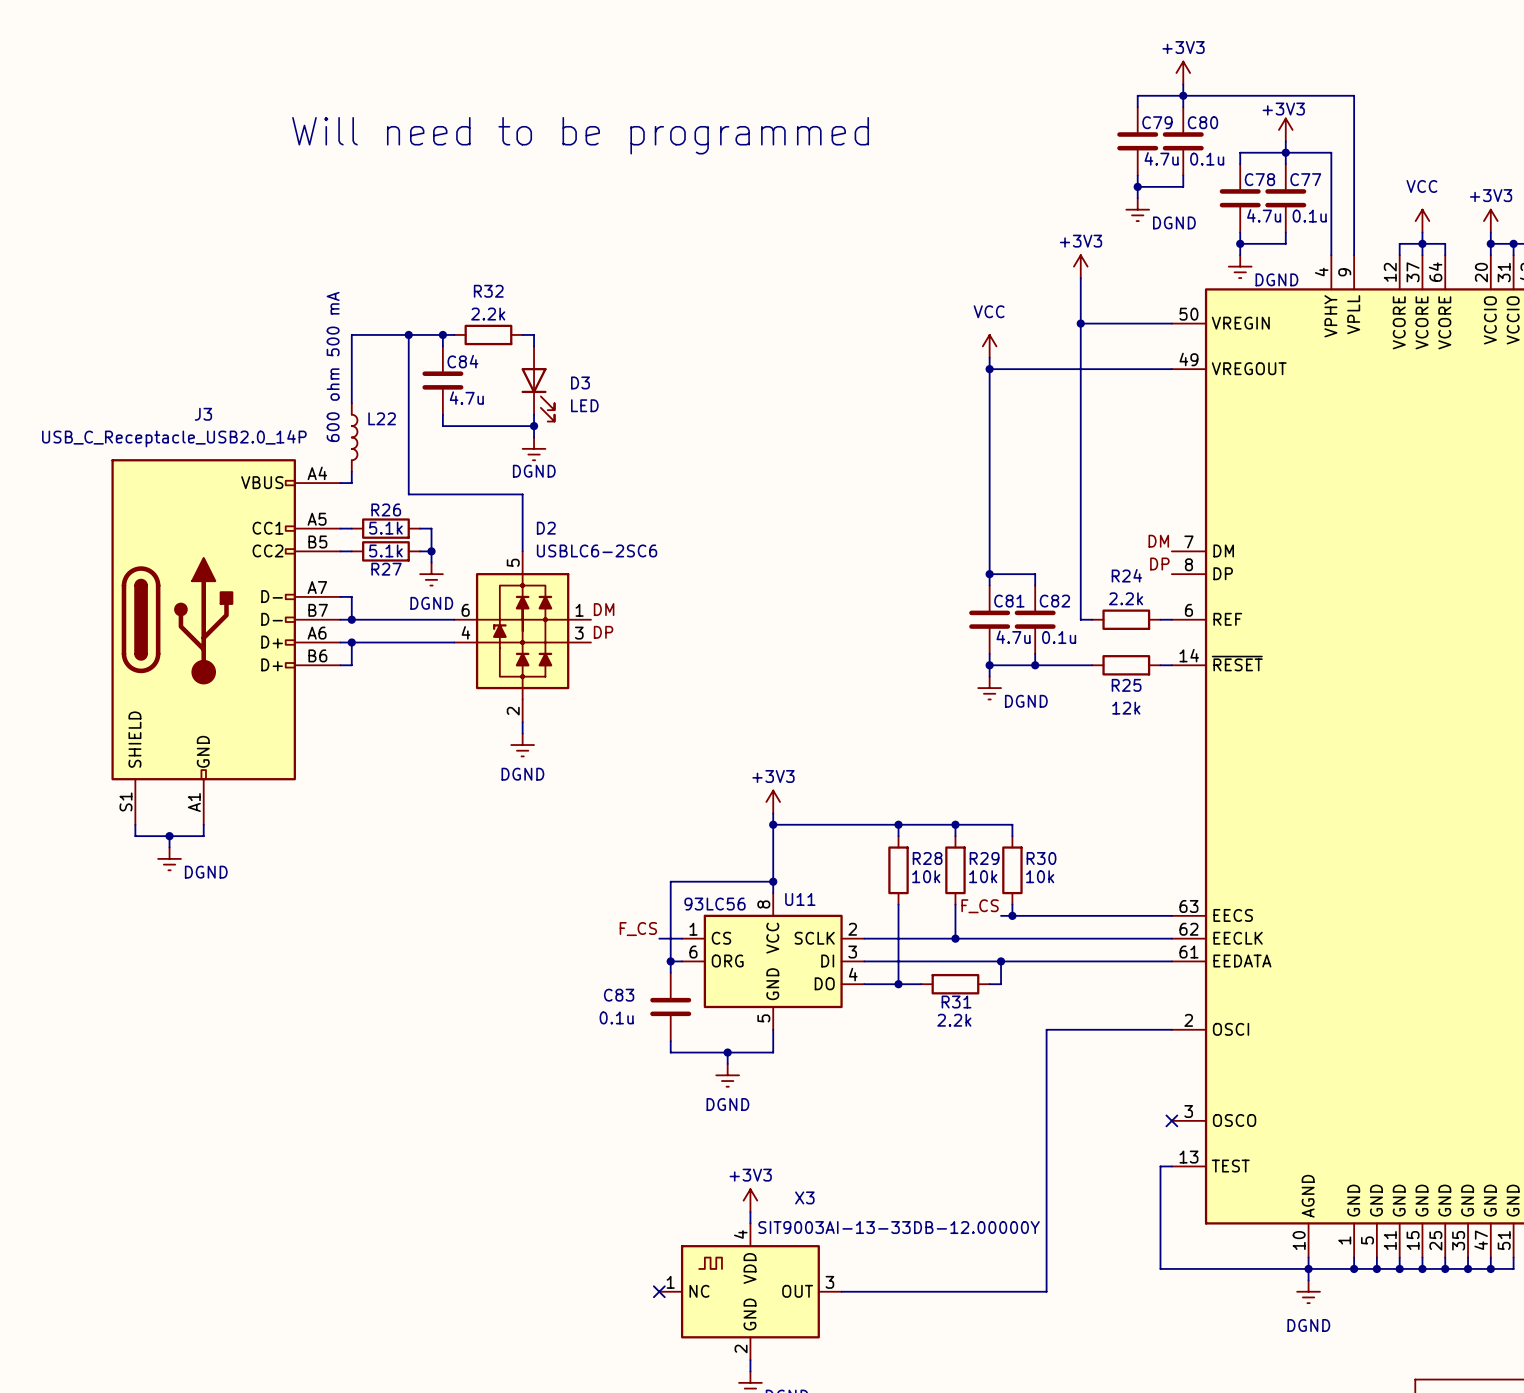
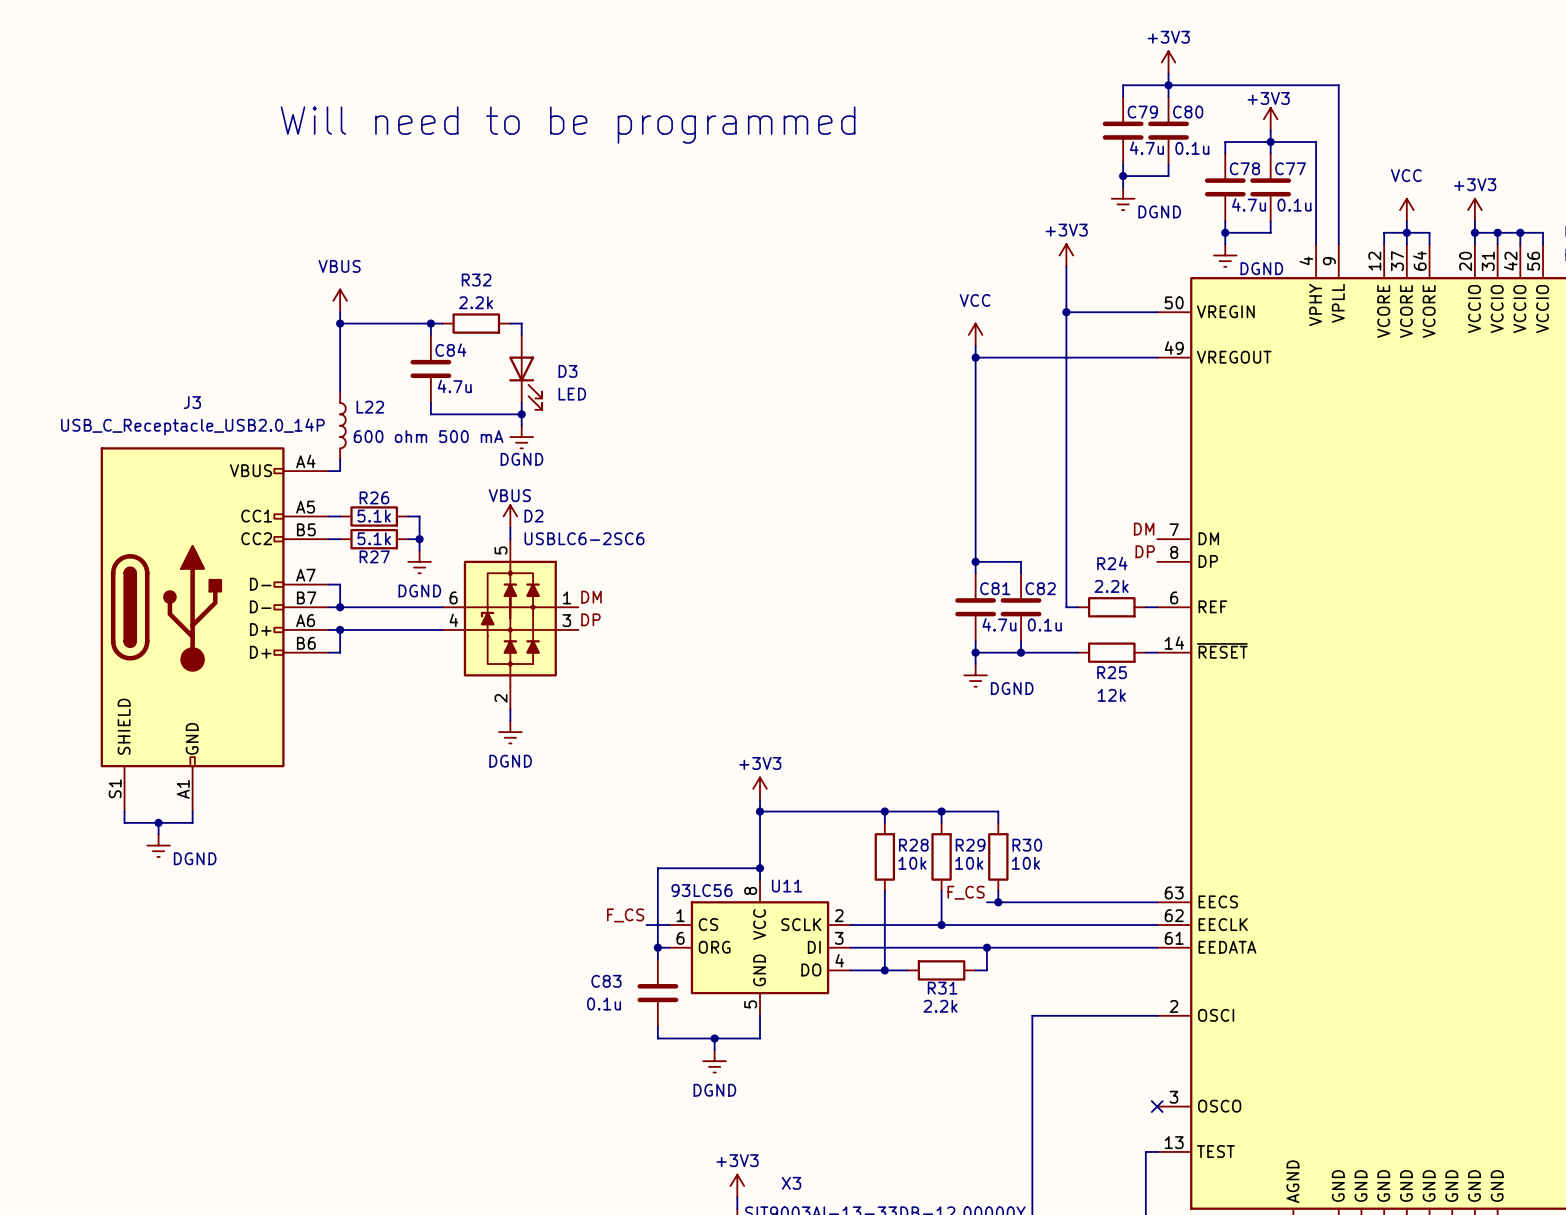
power symbol: none -> VBUS (340, 300)
wire: none -> (340, 312) (340, 323)
junction: none -> (340, 323)
wire: (408, 334) (408, 494) (522, 494) (522, 540) -> none
junction: (408, 334) -> none
L22 value rotation: 0° (333, 366) -> 90° clockwise (428, 436)
J3 value position: USB_C_Receptacle_USB2.0_14P (174, 438) -> USB_C_Receptacle_USB2.0_14P (192, 426)
power symbol: none -> VBUS (510, 516)

